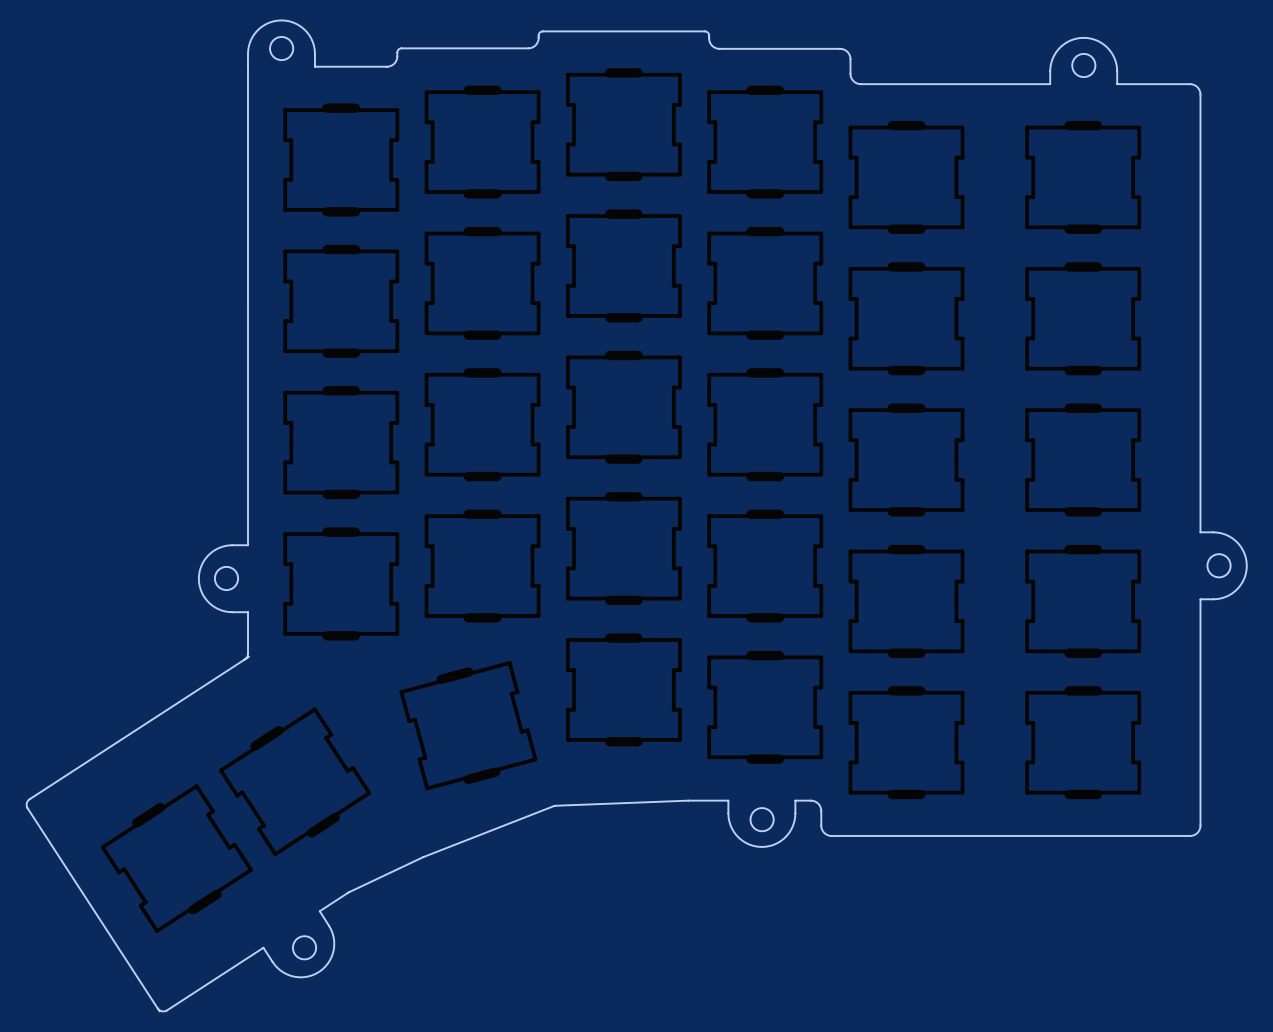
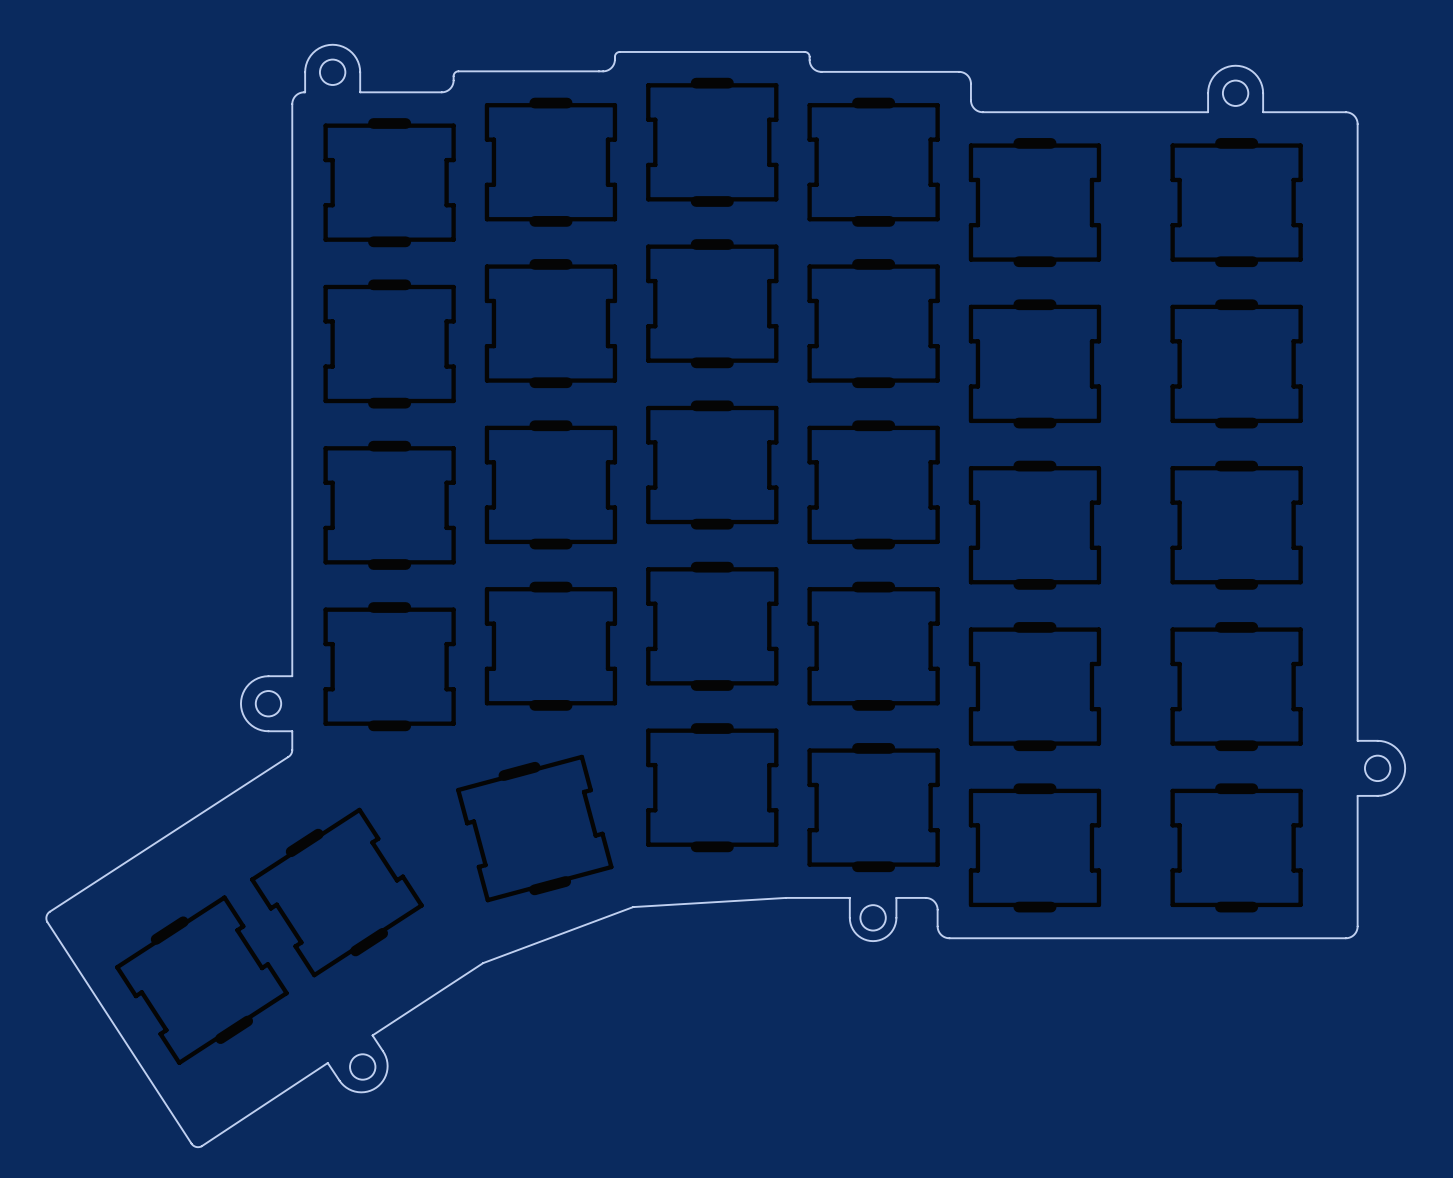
round board edge: [269, 36, 294, 61] -> none
round board edge: none -> [319, 59, 346, 86]
round board edge: [1072, 53, 1096, 78] -> none
round board edge: none -> [1222, 80, 1249, 107]
board edge: (850, 73) (853, 81) (860, 84) (1050, 84) (1051, 63) (1056, 52) (1068, 41) (1083, 37) (1099, 41) (1111, 52) (1116, 63) (1117, 84) (1190, 84) (1198, 88) (1200, 94) (1200, 532) (1221, 533) (1232, 538) (1242, 550) (1246, 565) (1242, 581) (1232, 593) (1221, 598) (1200, 599) (1200, 825) (1195, 834) (831, 835) (825, 833) (822, 829) (821, 811) -> (970, 84) (971, 104) (975, 109) (981, 112) (1208, 112) (1208, 89) (1213, 76) (1225, 67) (1239, 65) (1249, 69) (1259, 79) (1262, 89) (1263, 112) (1345, 112) (1351, 113) (1356, 118) (1357, 124) (1357, 740) (1381, 741) (1391, 744) (1401, 754) (1405, 768) (1401, 782) (1391, 792) (1381, 795) (1357, 795) (1357, 926) (1355, 933) (1348, 937) (949, 938) (941, 934) (937, 926)
board edge: (850, 73) (850, 56) (842, 49) (718, 48) (711, 44) (708, 34) (704, 31) (542, 31) (538, 34) (536, 44) (529, 48) (401, 48) (397, 50) (395, 61) (389, 66) (314, 66) (312, 42) (300, 26) (289, 21) (277, 20) (259, 28) (250, 42) (247, 53) (248, 545) (228, 545) (213, 551) (202, 563) (198, 578) (202, 594) (213, 606) (228, 611) (248, 612) (247, 654) (244, 659) -> (970, 83) (967, 75) (960, 71) (819, 71) (812, 67) (809, 54) (805, 52) (619, 51) (615, 54) (612, 66) (604, 71) (457, 71) (453, 74) (452, 86) (444, 91) (360, 92) (359, 65) (349, 50) (339, 45) (329, 45) (313, 52) (306, 65) (305, 92) (295, 95) (292, 104) (292, 676) (264, 676) (254, 679) (244, 689) (240, 703) (244, 717) (254, 727) (264, 731) (292, 731) (291, 752) (288, 756) (49, 911) (46, 918) (191, 1143) (198, 1147) (327, 1063) (341, 1083) (349, 1089) (361, 1092) (373, 1089) (382, 1081) (387, 1066) (384, 1053) (372, 1035) (483, 963) (633, 907) (785, 897) (849, 897) (850, 920) (852, 929) (861, 938) (873, 941) (884, 938) (893, 929) (896, 920) (896, 897) (925, 897) (932, 900) (936, 905) (937, 925)
round board edge: [1207, 553, 1231, 578] -> none
round board edge: [214, 566, 239, 591] -> none
round board edge: none -> [255, 690, 282, 717]
board edge: (248, 656) (29, 799) (26, 803) (27, 808) (159, 1011) -> none
round board edge: none -> [1364, 755, 1391, 782]
round board edge: none -> [860, 904, 887, 931]
round board edge: [750, 807, 774, 832] -> none
board edge: (821, 811) (819, 805) (814, 801) (795, 800) (794, 821) (789, 832) (777, 843) (761, 846) (746, 843) (734, 832) (729, 821) (728, 800) (554, 805) (423, 857) (348, 892) (319, 911) (330, 929) (334, 944) (329, 960) (315, 974) (299, 977) (284, 972) (274, 965) (263, 947) (166, 1010) (161, 1011) (157, 1008) -> none
round board edge: none -> [349, 1054, 376, 1080]
round board edge: [292, 936, 317, 960] -> none

